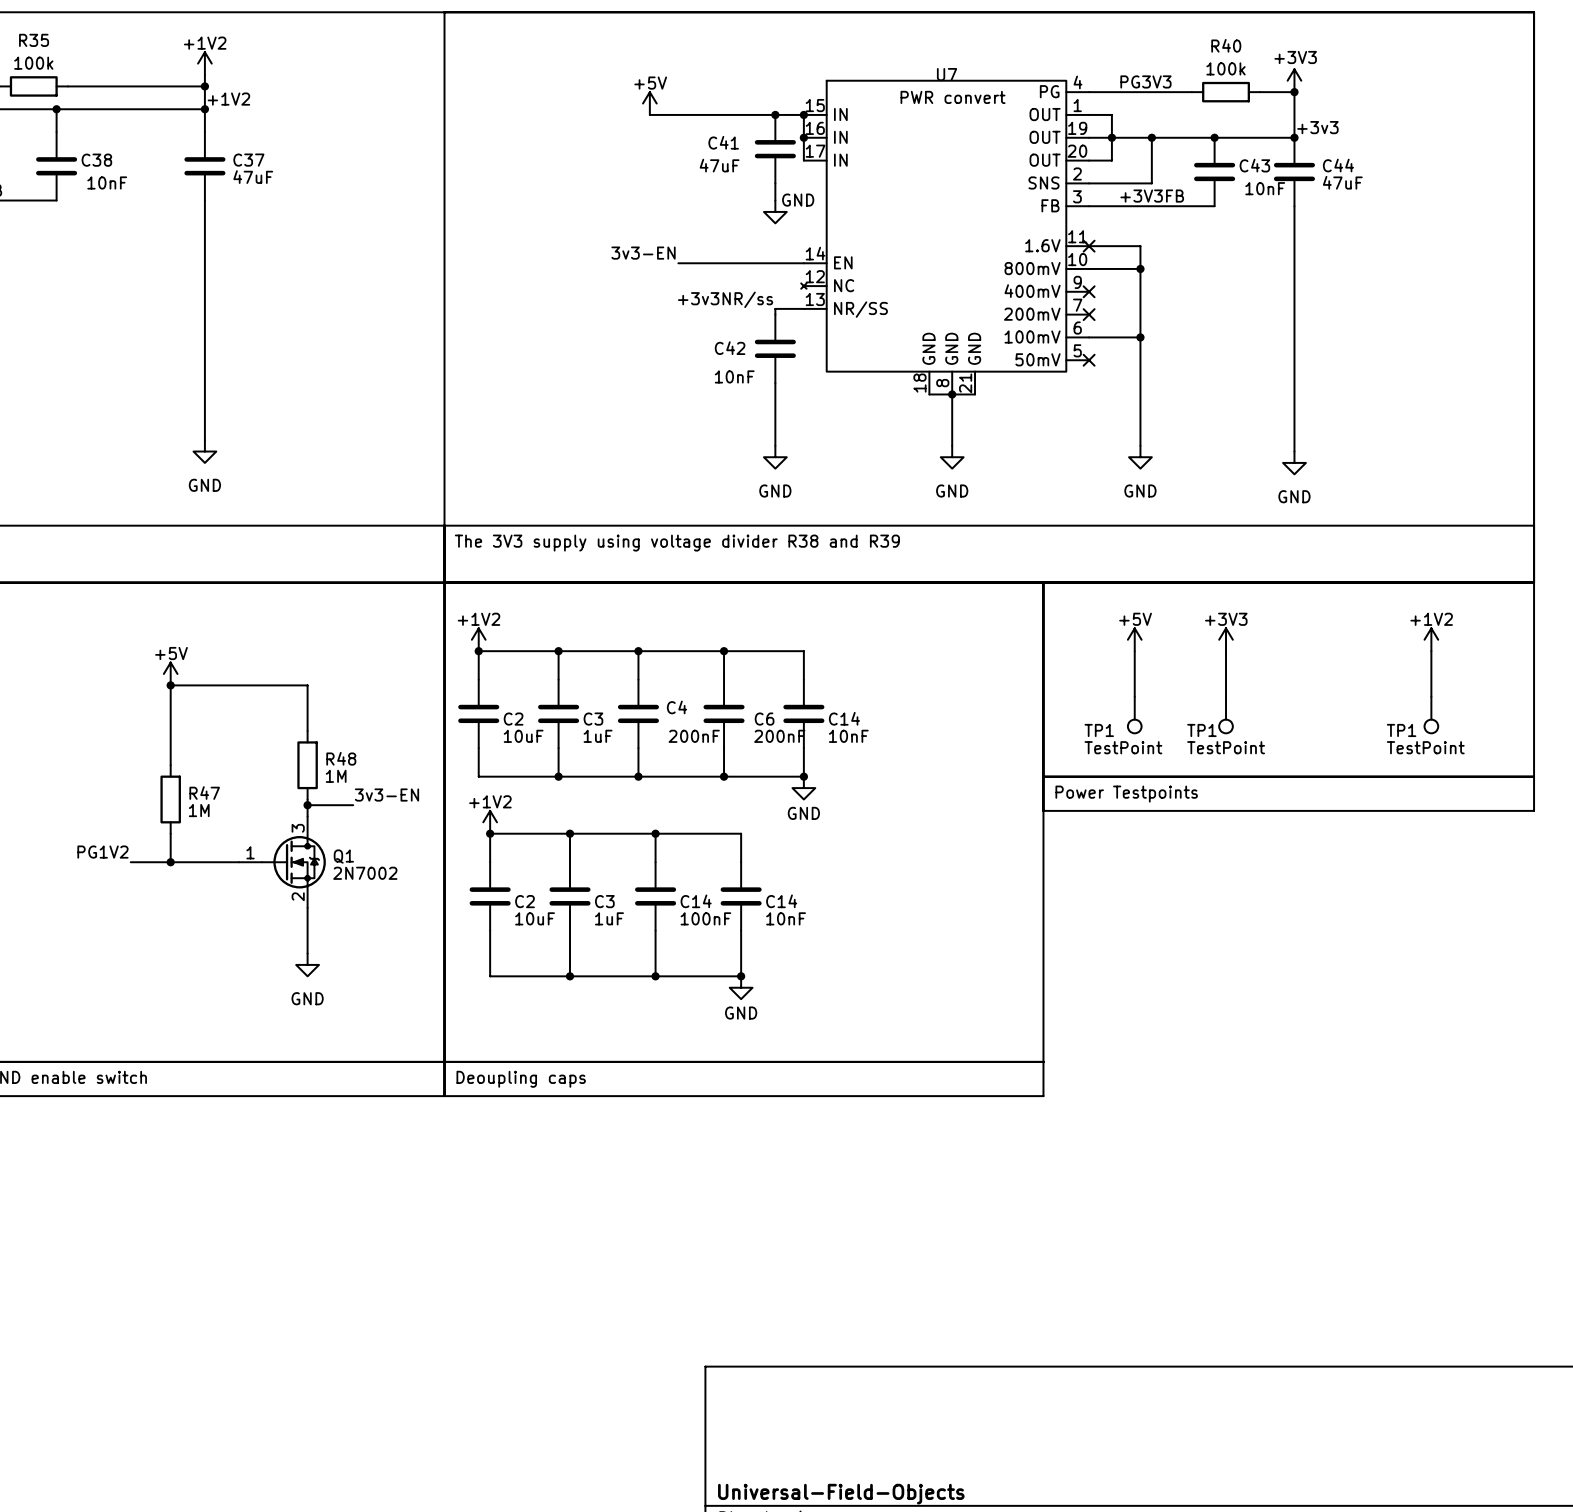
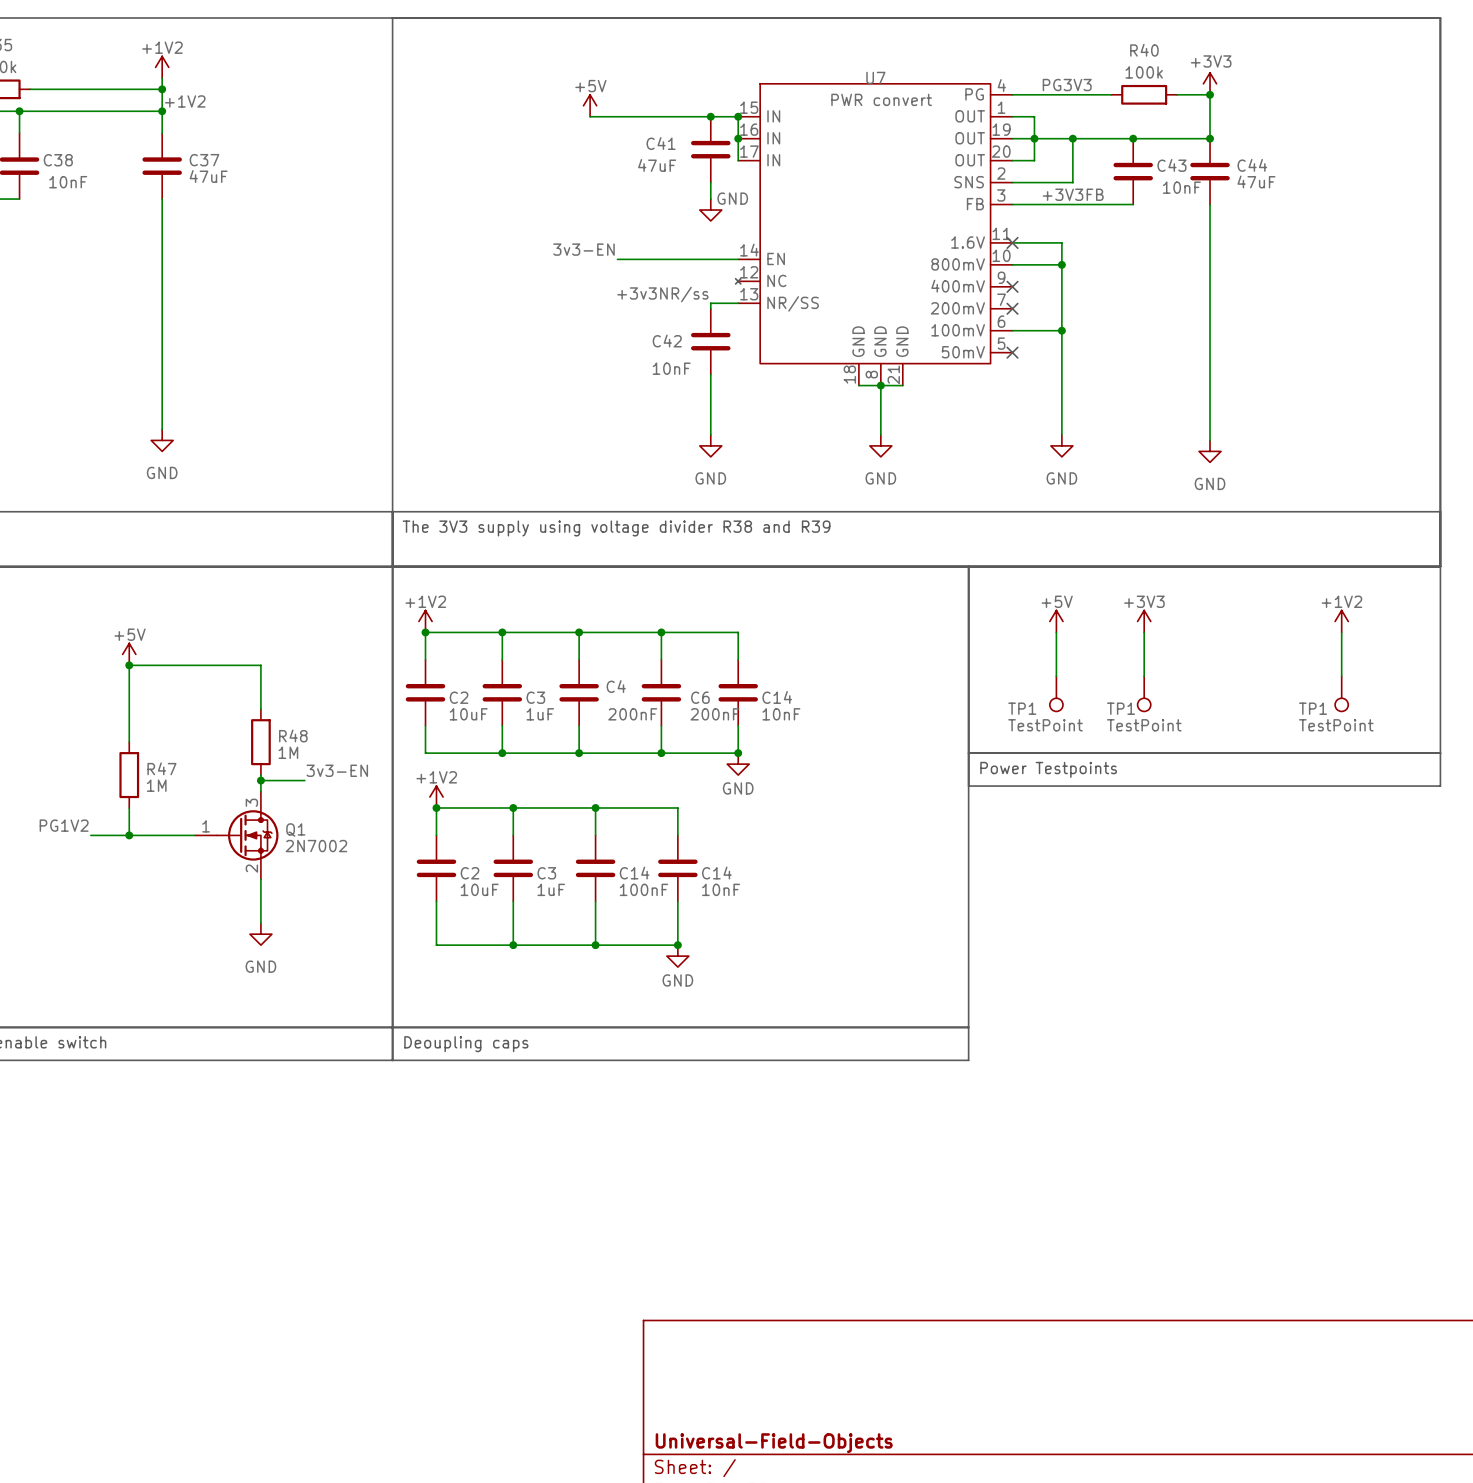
label: +3v3 (1317, 127) -> none

